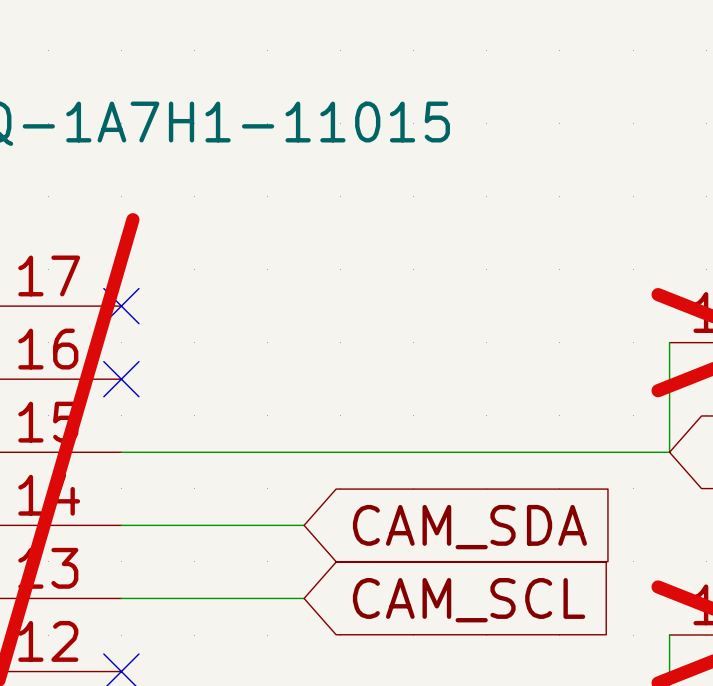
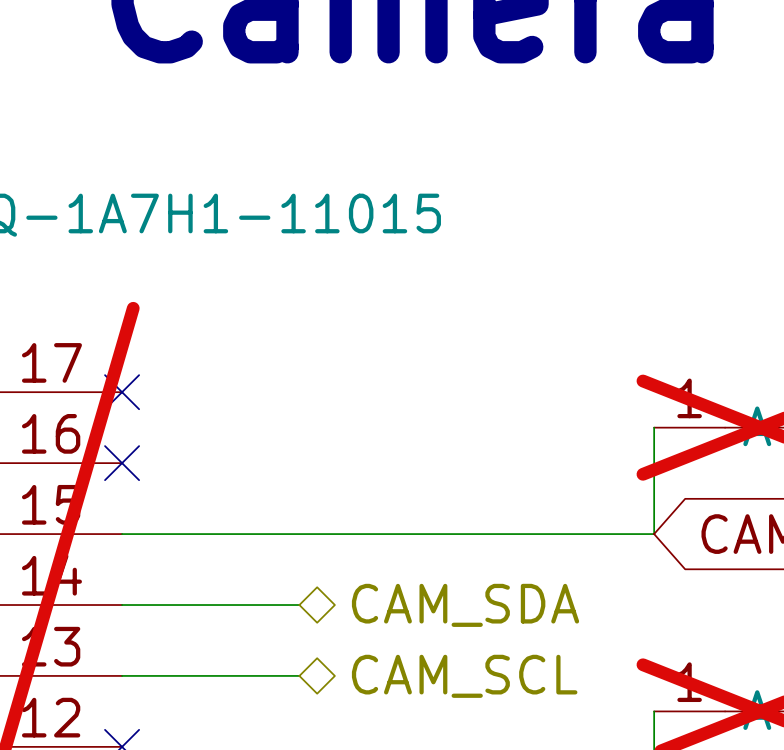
hierarchical label: none -> CAM_SDA (465, 605)
global label: CAM_SDA (469, 527) -> none
hierarchical label: none -> CAM_SCL (464, 676)
global label: CAM_SCL (469, 600) -> none

